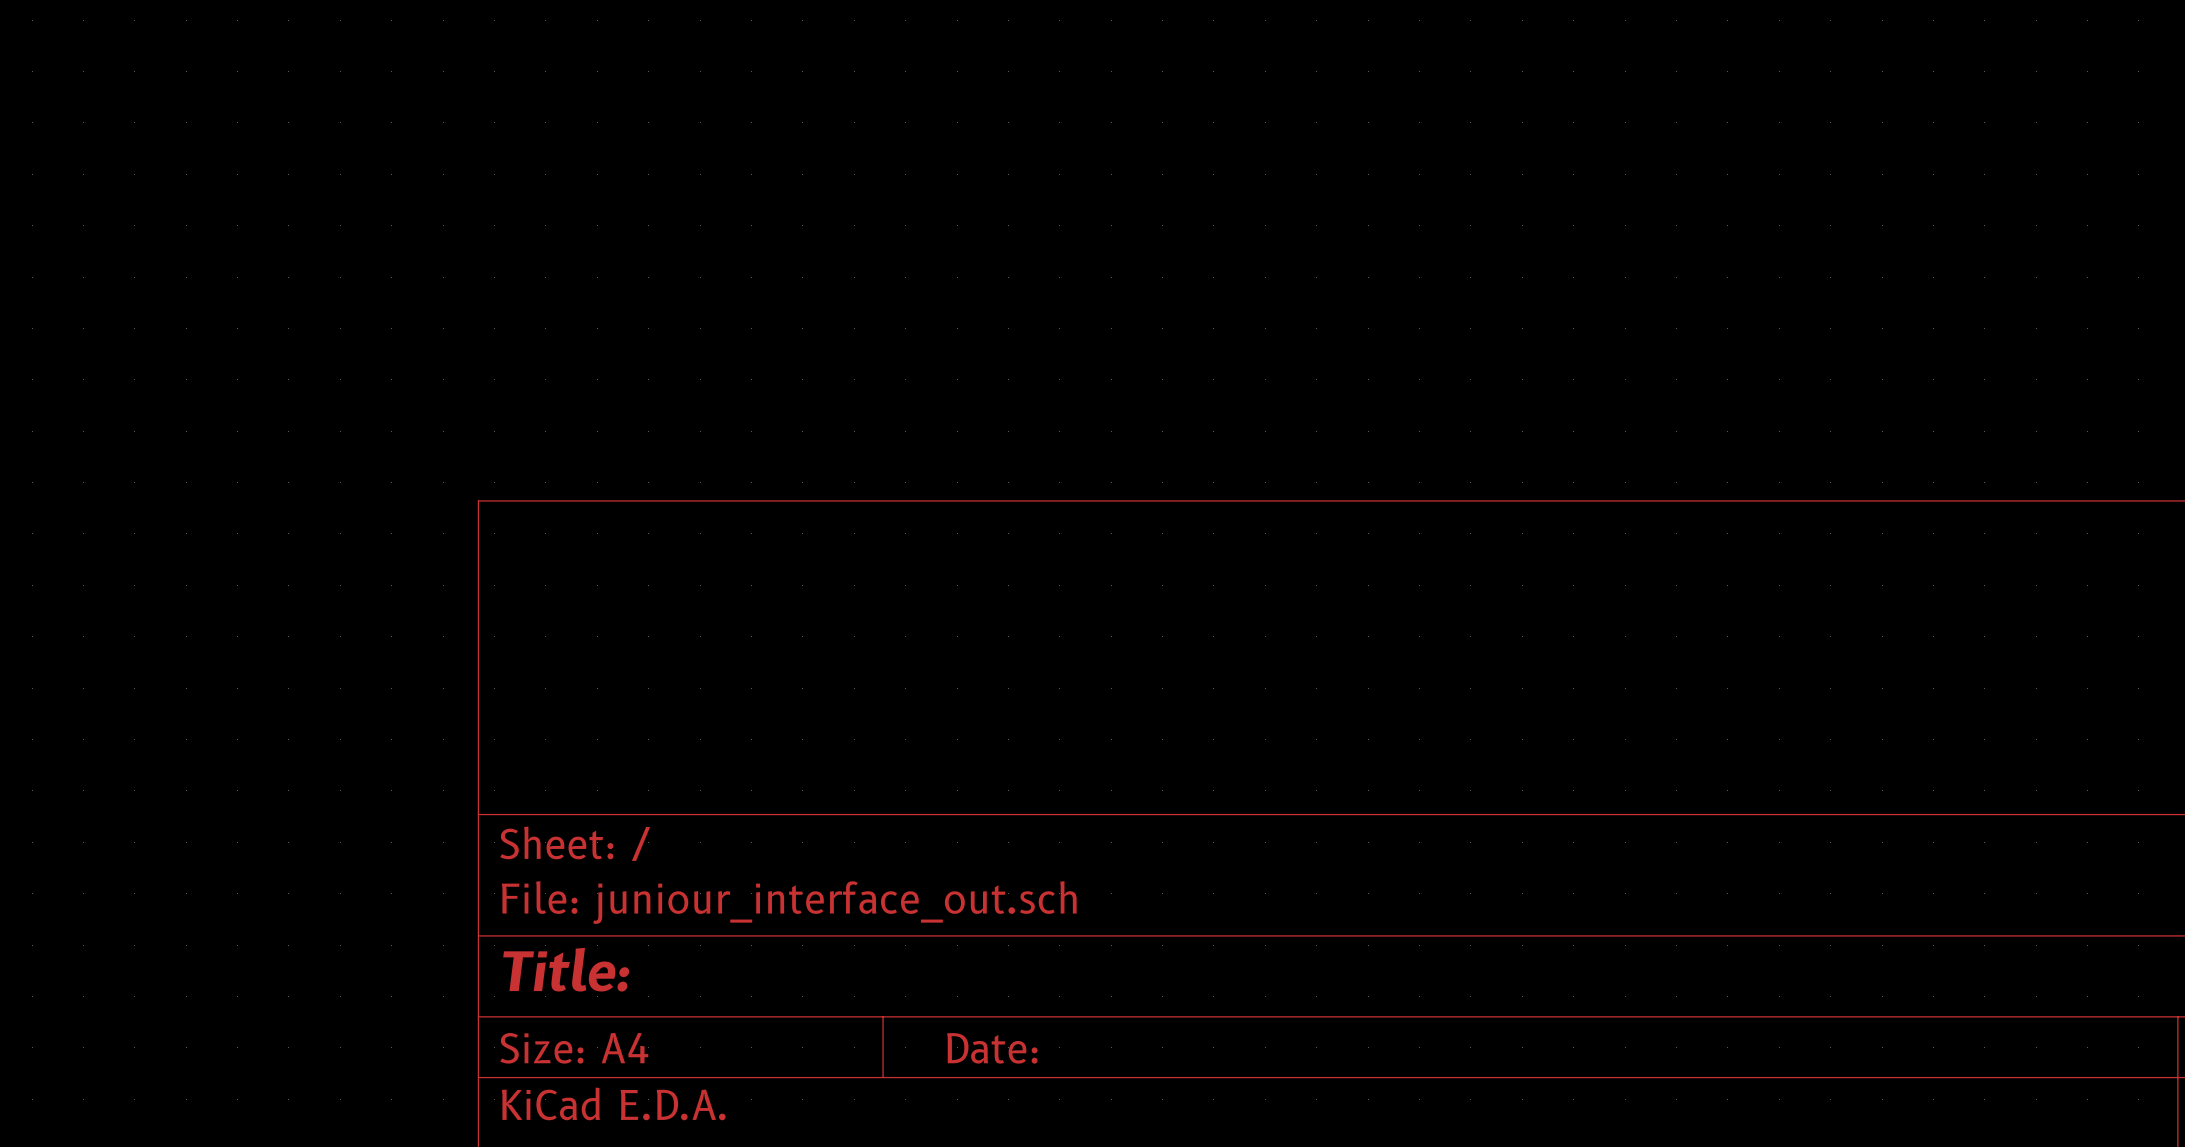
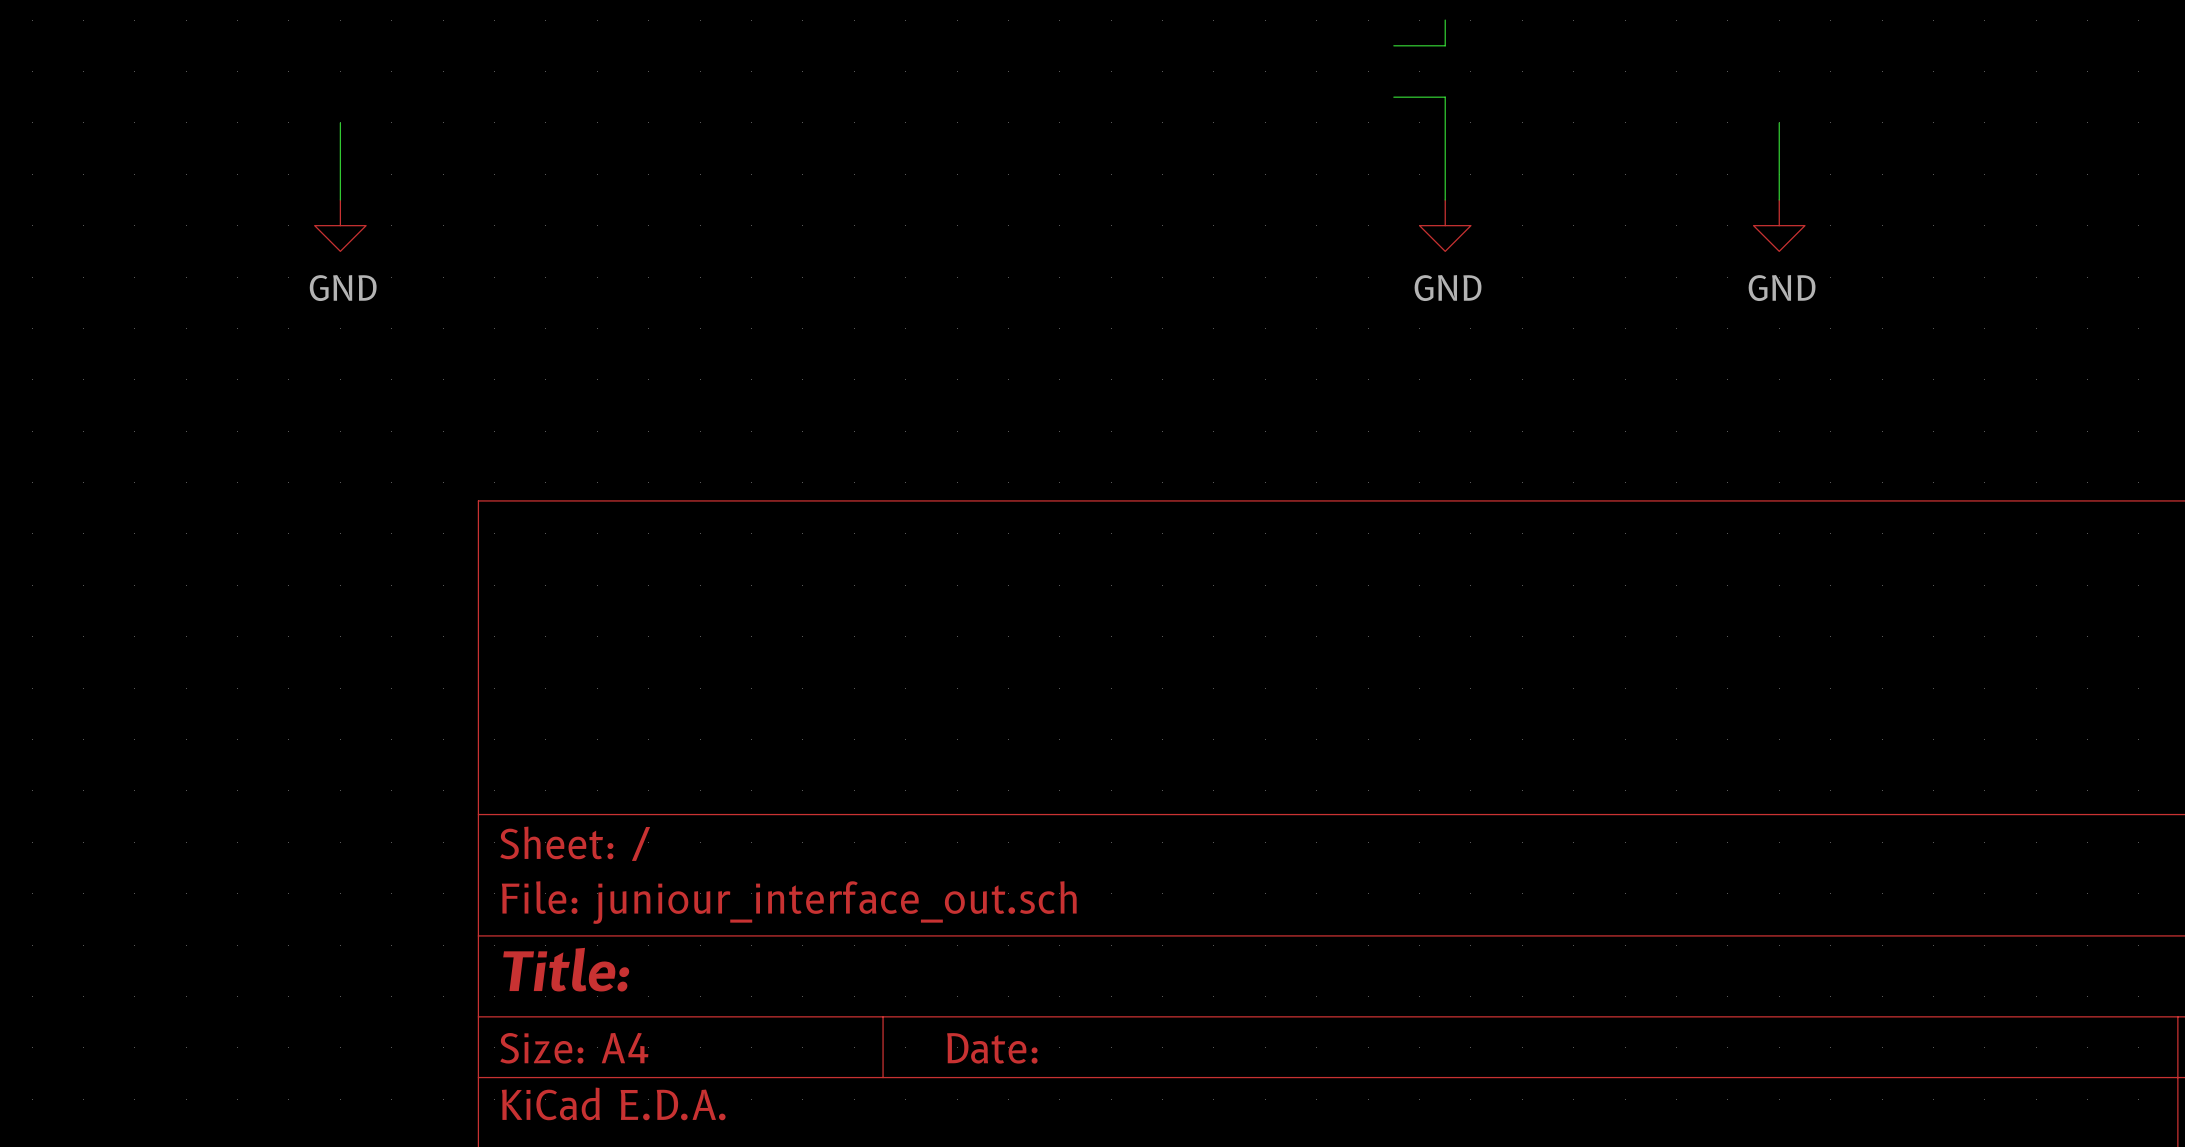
wire: none -> (1445, 20) (1445, 45) (1393, 45)
wire: none -> (1393, 97) (1445, 97) (1445, 199)
wire: none -> (340, 122) (340, 199)
wire: none -> (1779, 122) (1779, 199)
power symbol: none -> GND (340, 225)
power symbol: none -> GND (1445, 225)
power symbol: none -> GND (1779, 225)

